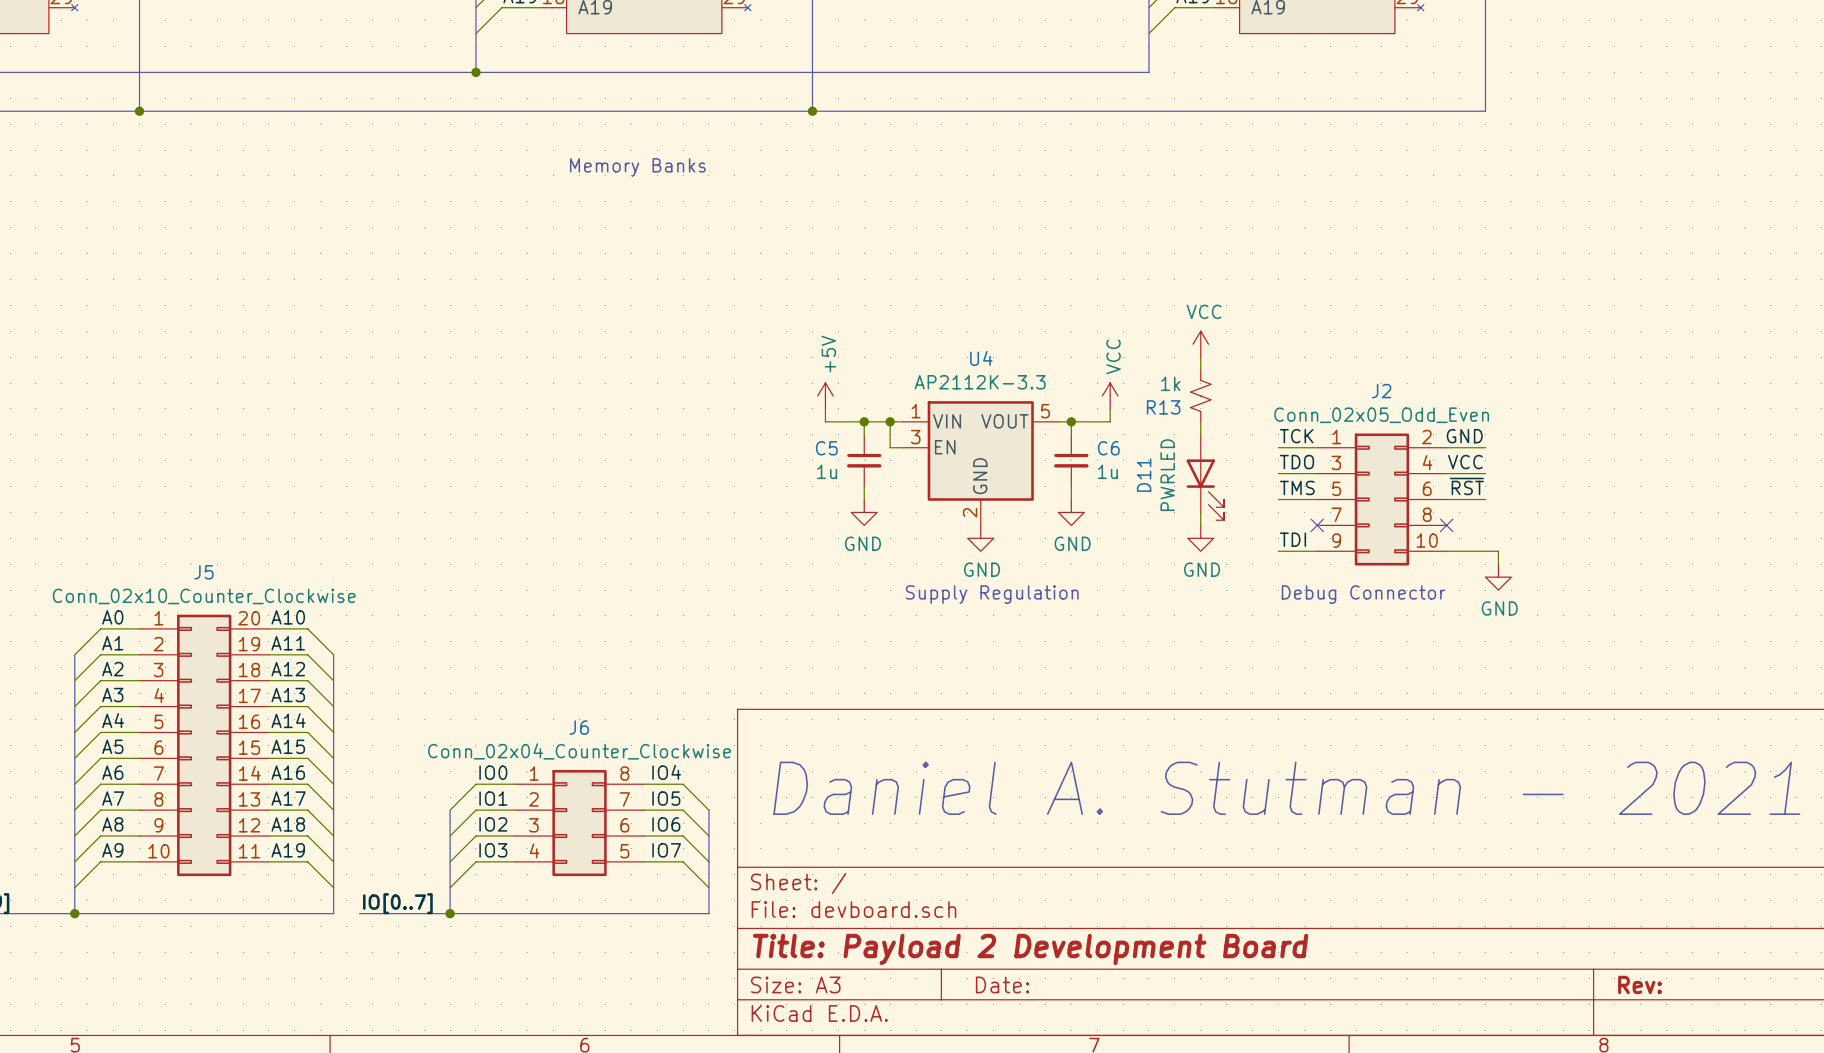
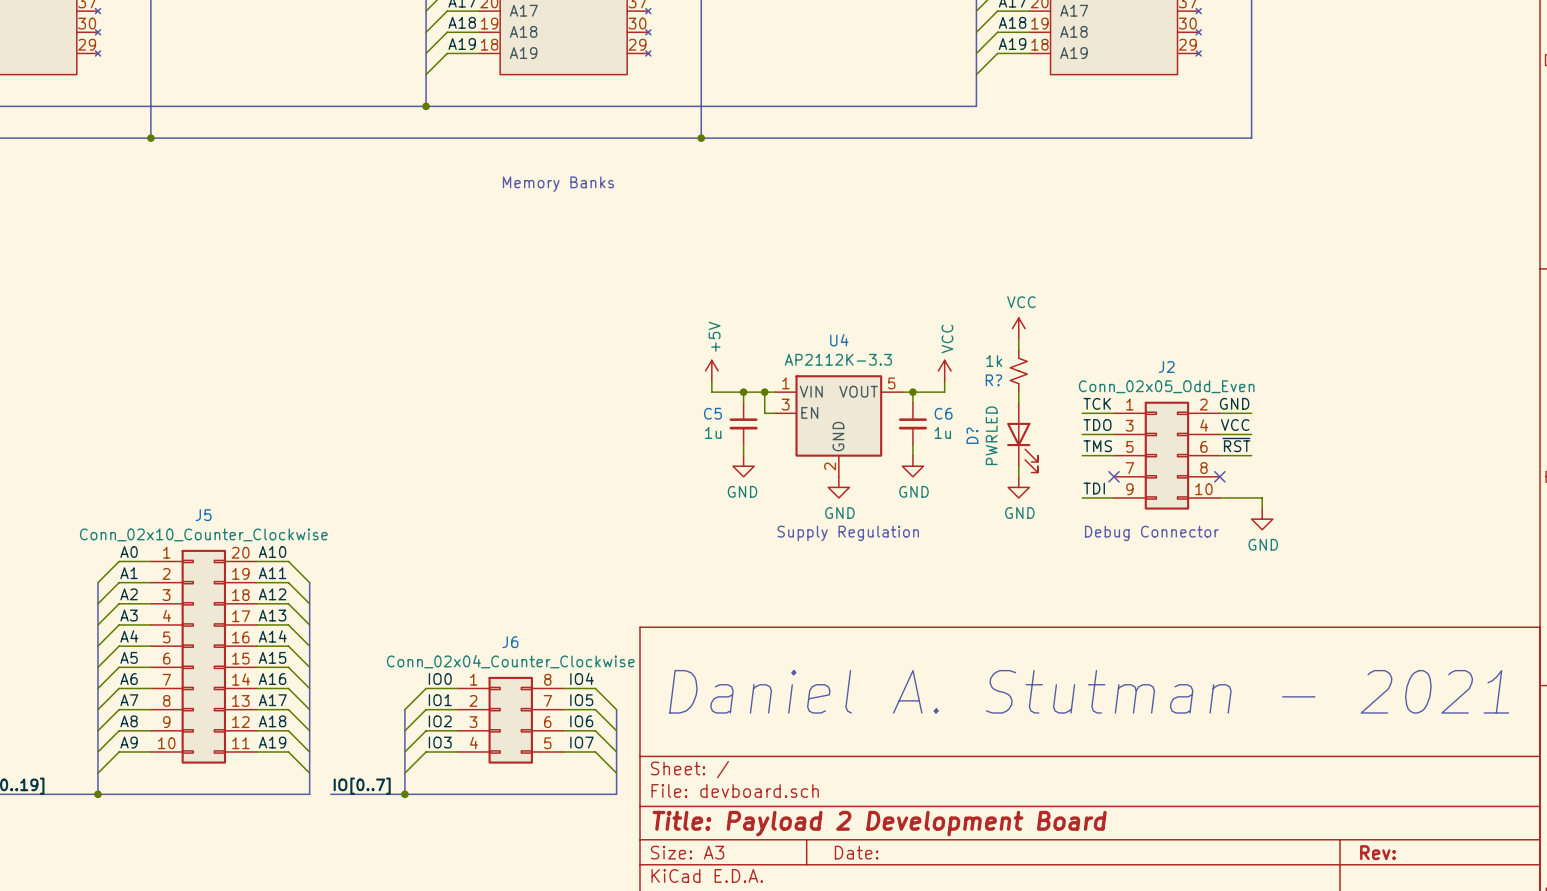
R13 name: R13 (1163, 407) -> R? (993, 380)
D11 name: D11 (1144, 475) -> D? (972, 435)

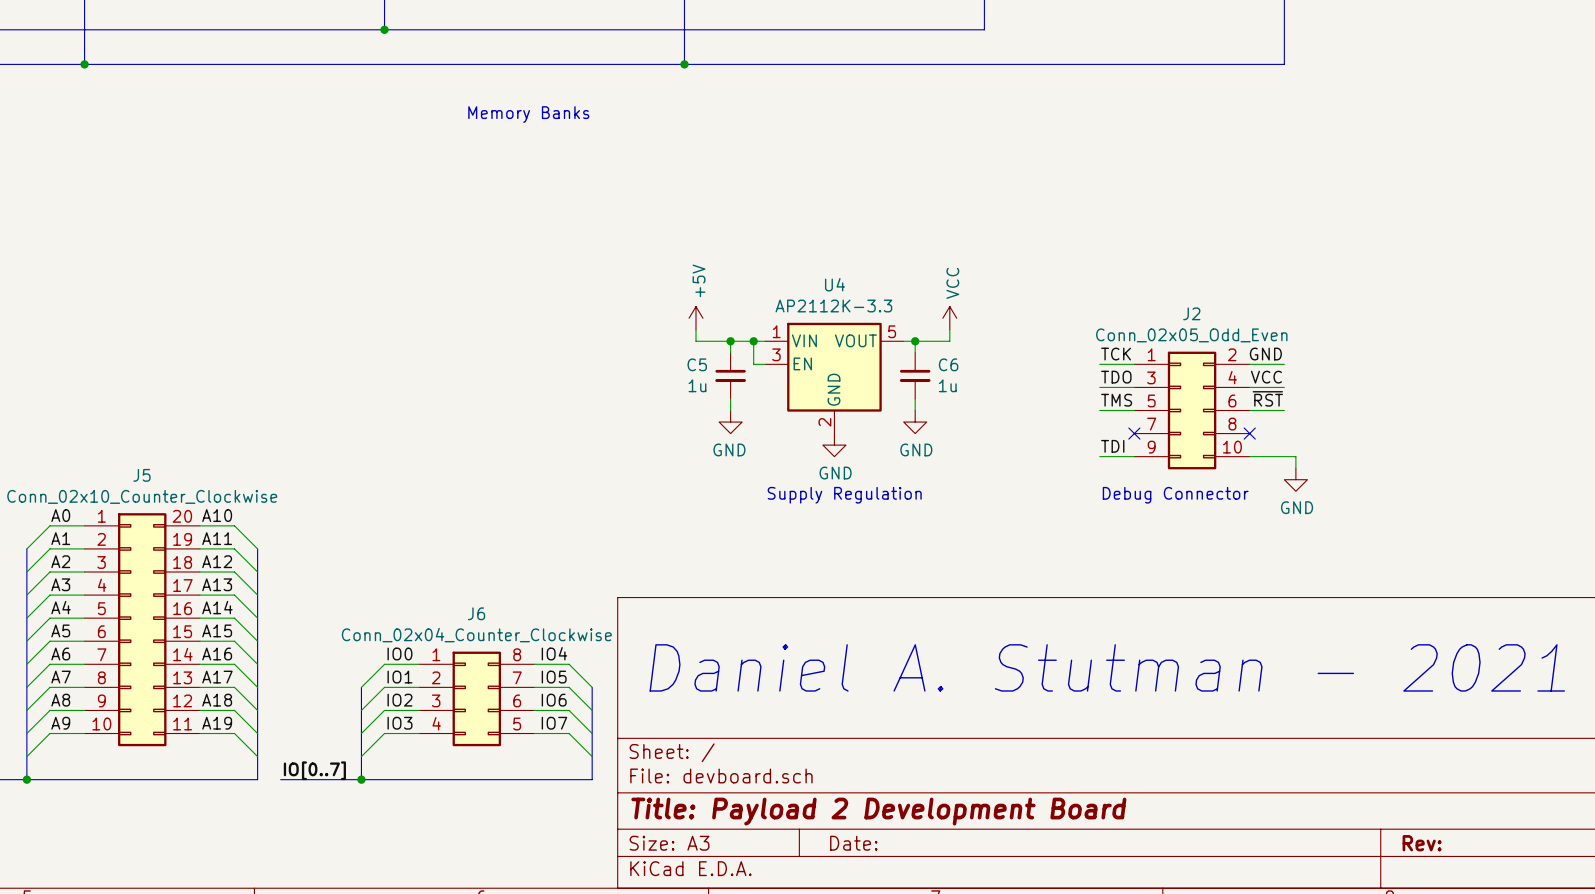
power symbol: VCC (1018, 328) -> none
wire: (1018, 339) (1018, 349) -> none
R?: 1k (1018, 370) -> none
wire: (1018, 392) (1018, 402) -> none
D?: PWRLED (1022, 437) -> none
wire: (1018, 466) (1018, 476) -> none
power symbol: GND (1018, 487) -> none

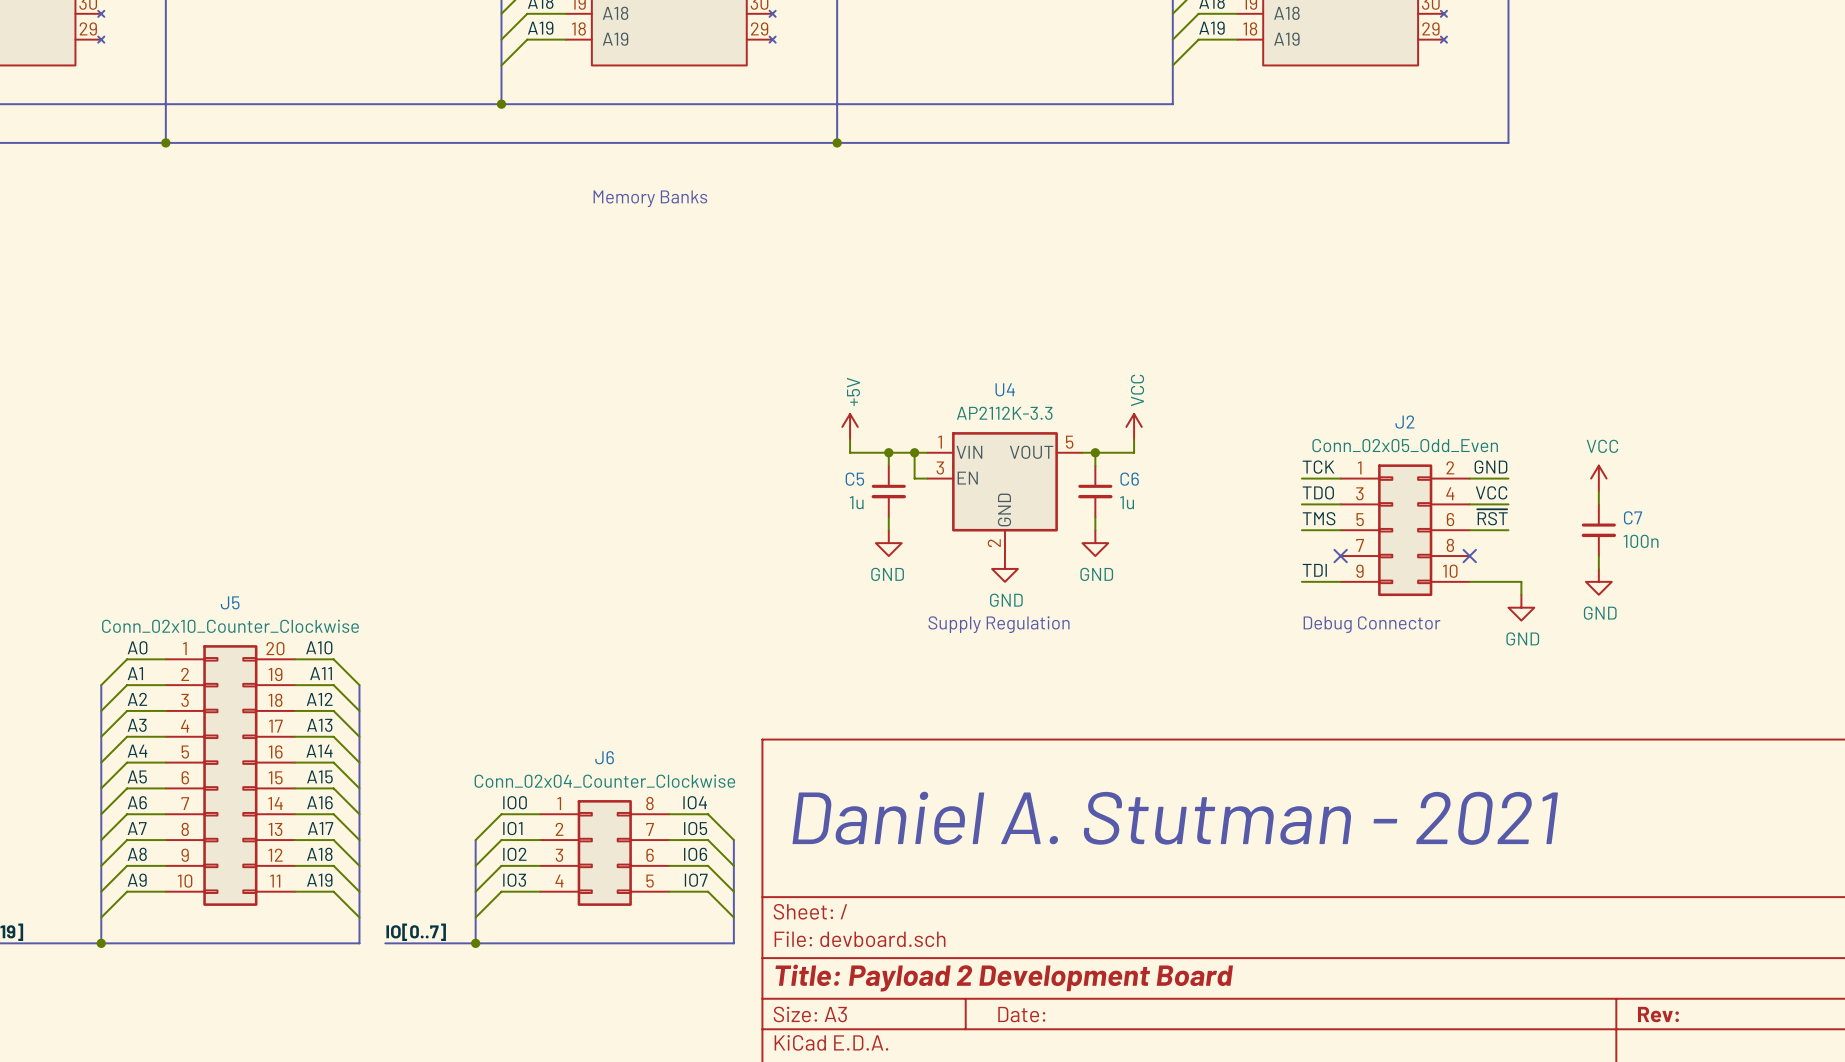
power symbol: none -> VCC (1598, 478)
wire: none -> (1598, 491) (1598, 504)
C7: none -> 100n (1598, 530)
wire: none -> (1598, 556) (1598, 568)
power symbol: none -> GND (1598, 581)

